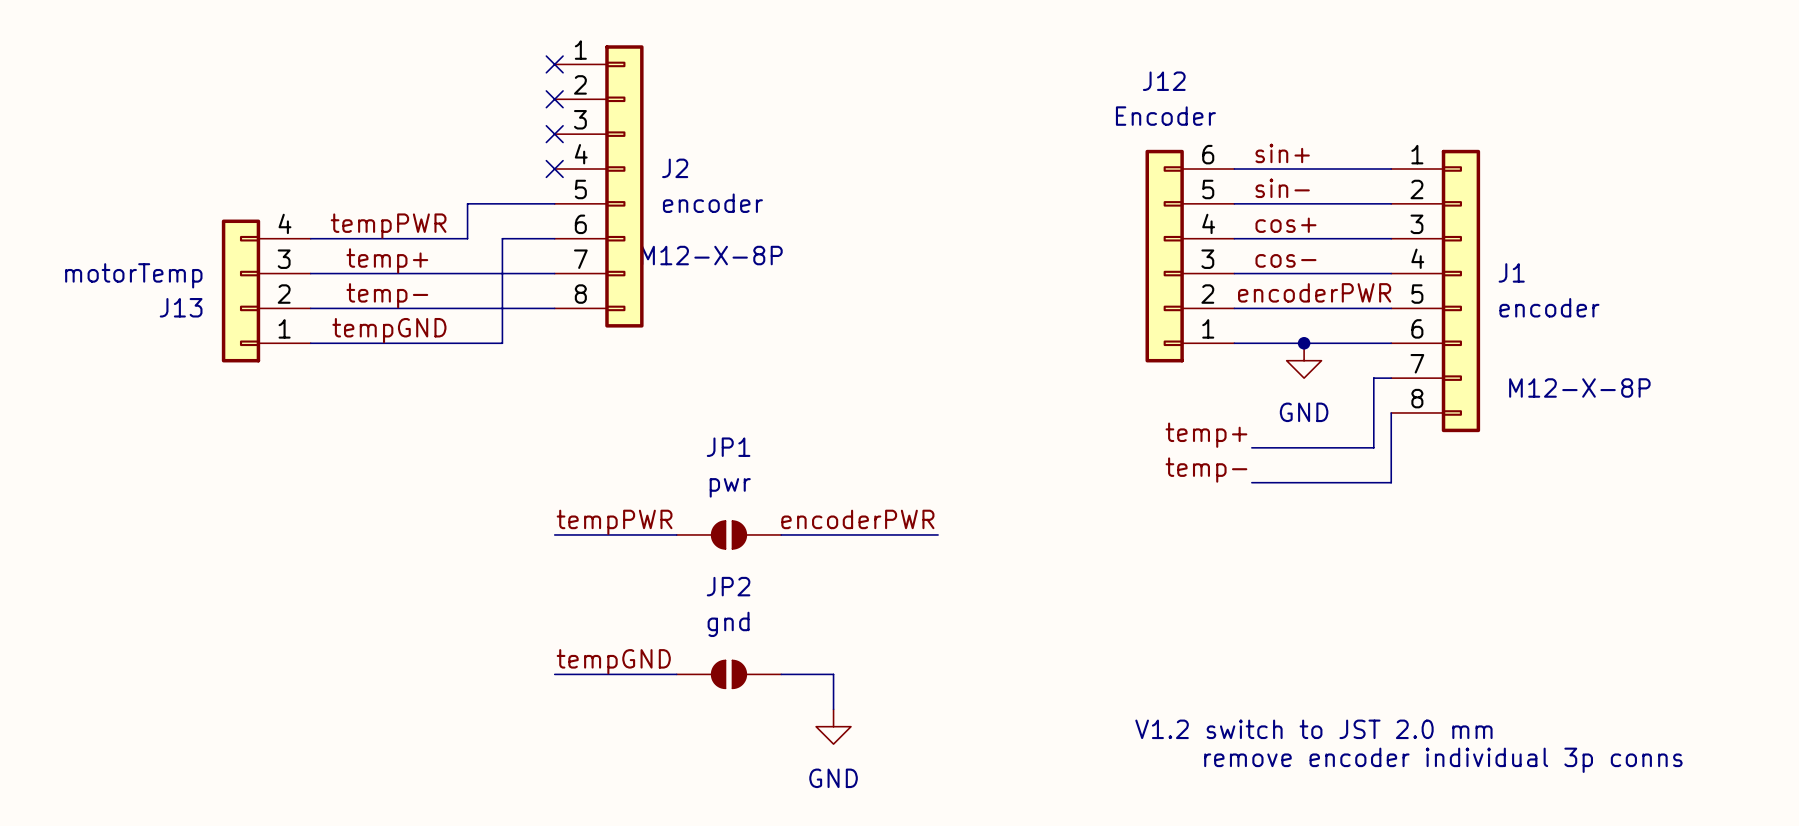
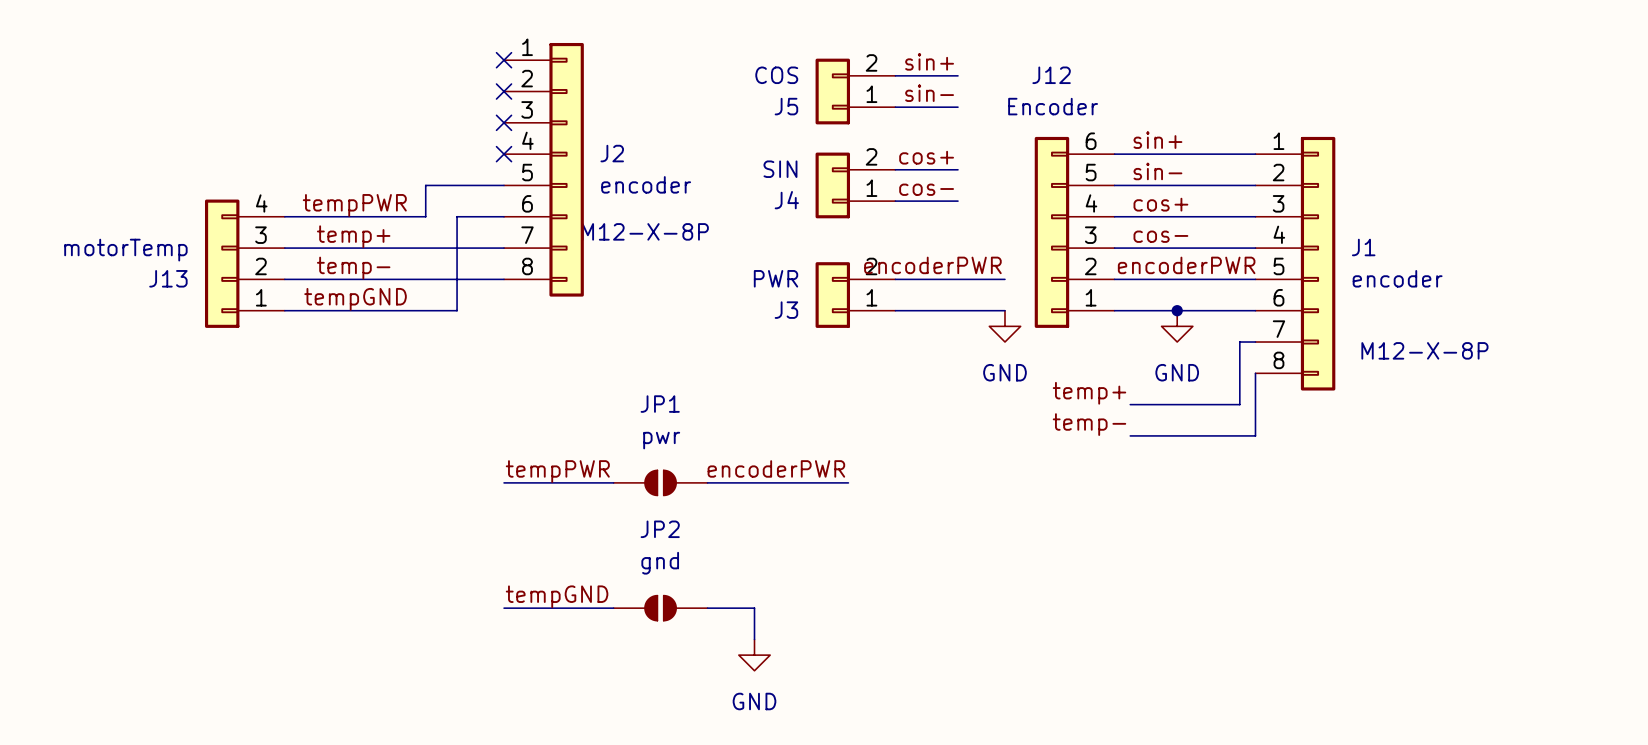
label: none -> sin+ (929, 61)
wire: none -> (895, 75) (958, 75)
J5: none -> COS (855, 91)
label: none -> sin- (929, 93)
wire: none -> (895, 107) (958, 107)
label: none -> cos+ (926, 157)
wire: none -> (895, 169) (958, 169)
J4: none -> SIN (855, 185)
label: none -> cos- (926, 189)
wire: none -> (895, 201) (958, 201)
label: none -> encoderPWR (932, 265)
wire: none -> (895, 279) (1004, 279)
J3: none -> PWR (855, 295)
wire: none -> (895, 310) (1004, 310)
power symbol: none -> GND (1004, 326)
text: V1.2 switch to JST 2.0 mm (1313, 729) -> none
text: remove encoder individual 3p conns (1443, 760) -> none

